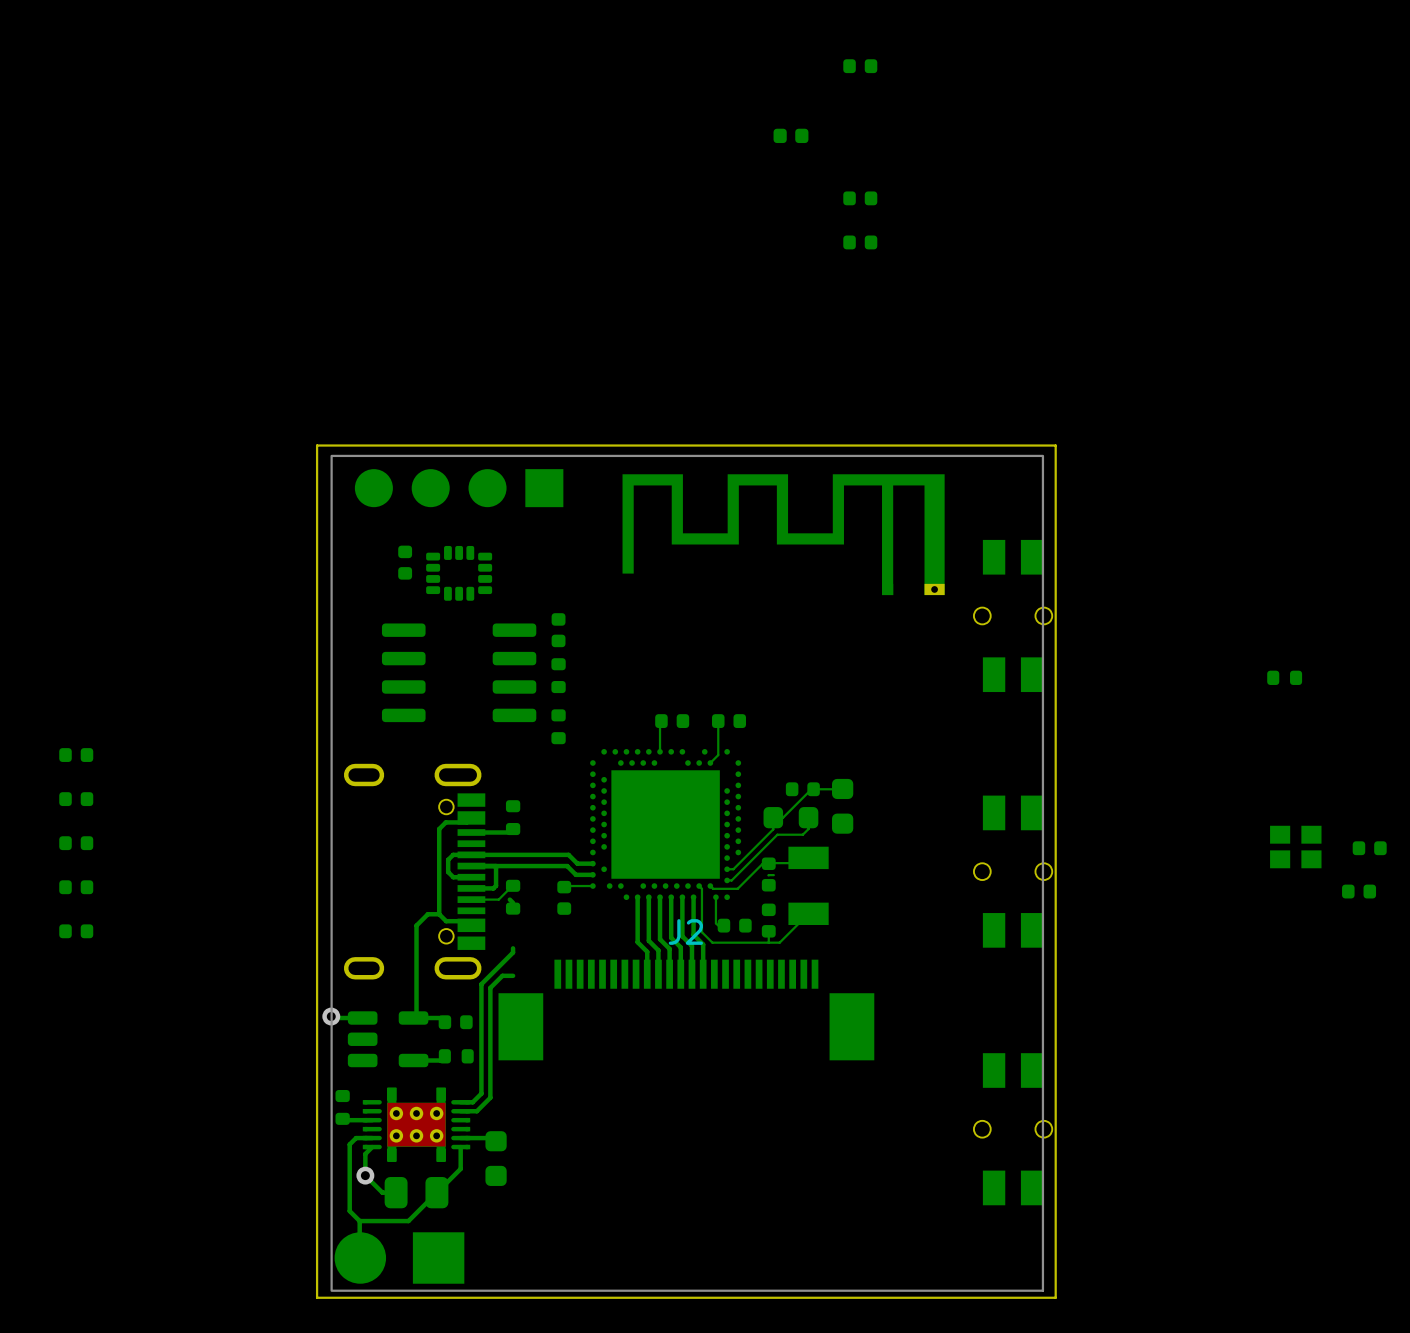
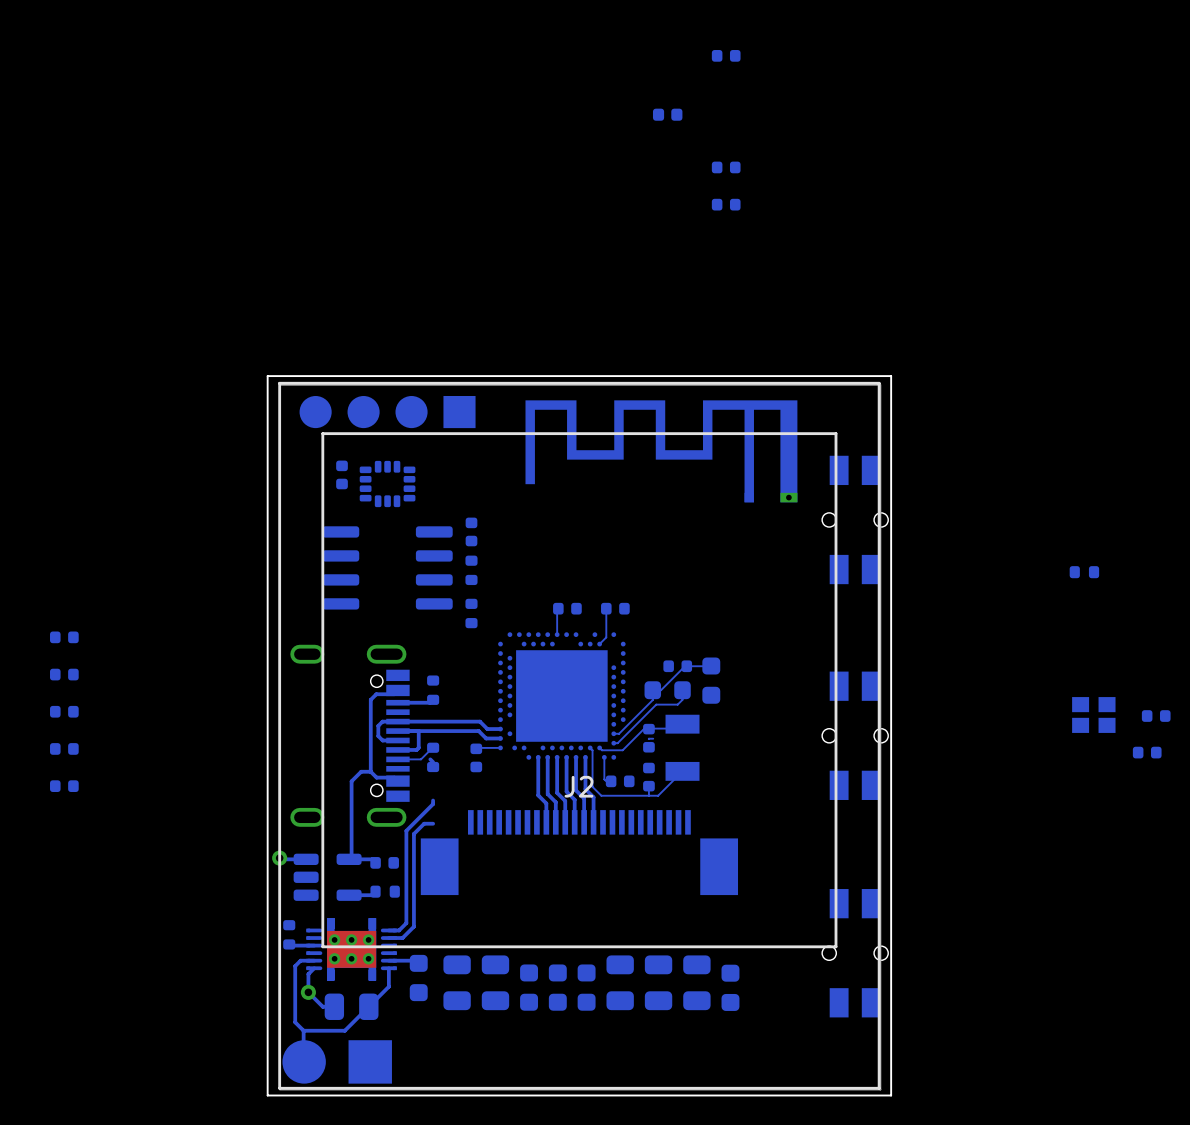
line: none -> (279, 383) (879, 383) (879, 1088) (279, 1088) (279, 383)
line: none -> (322, 433) (835, 433) (835, 946) (322, 946) (322, 433)
part: none -> (457, 982)
part: none -> (495, 982)
part: none -> (620, 982)
part: none -> (658, 982)
part: none -> (696, 982)
part: none -> (529, 987)
part: none -> (557, 987)
part: none -> (586, 987)
part: none -> (730, 987)

